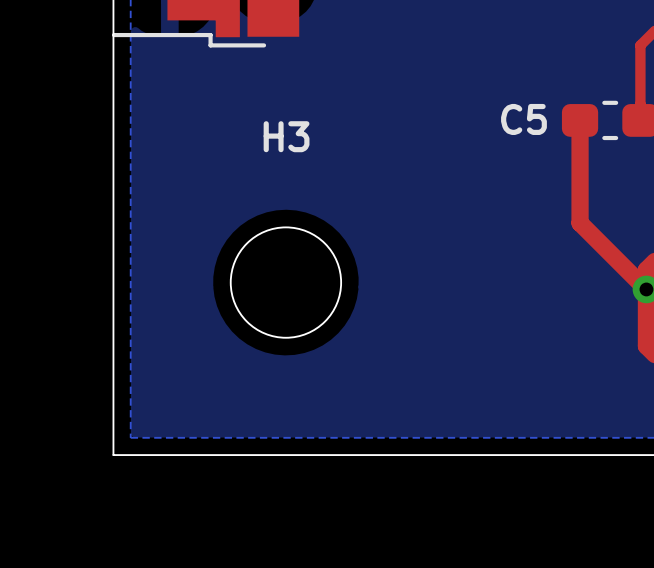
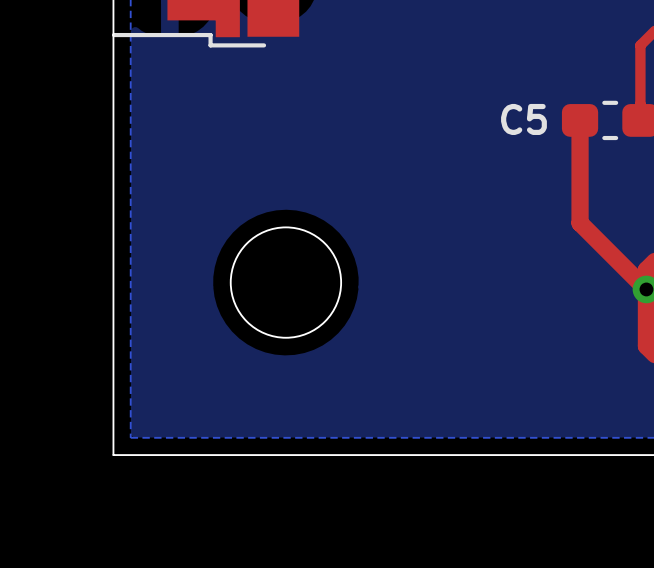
H3 name: H3 (286, 136) -> none

